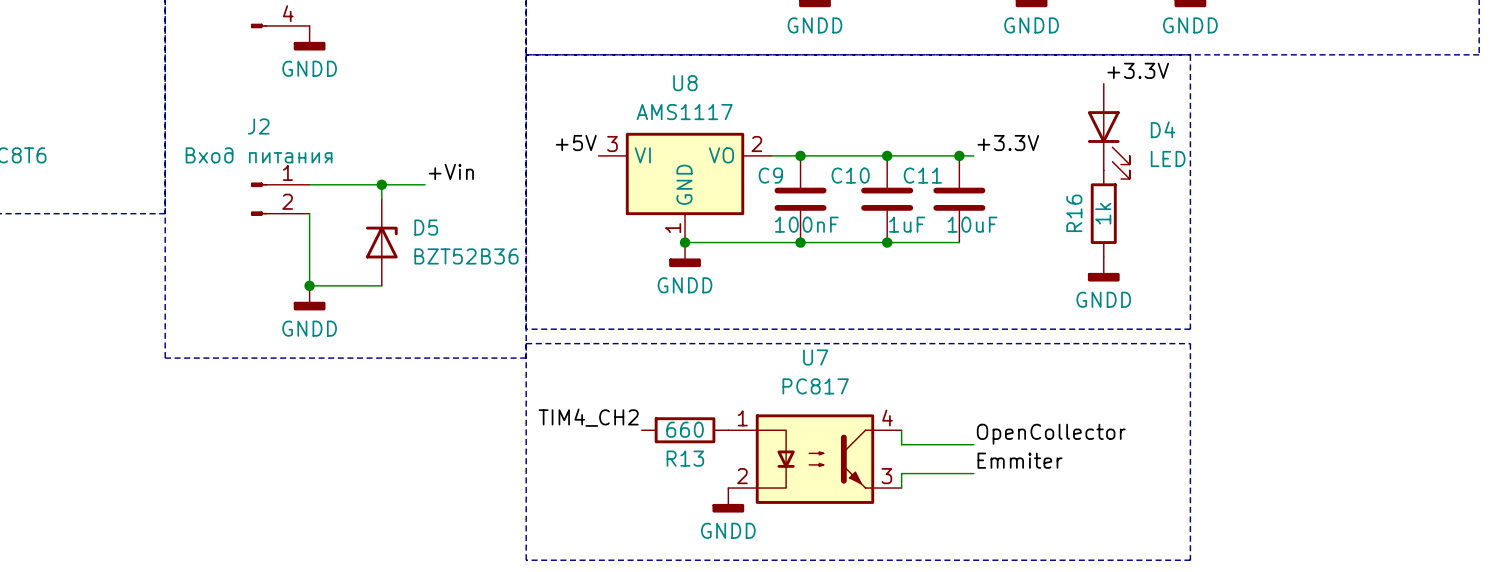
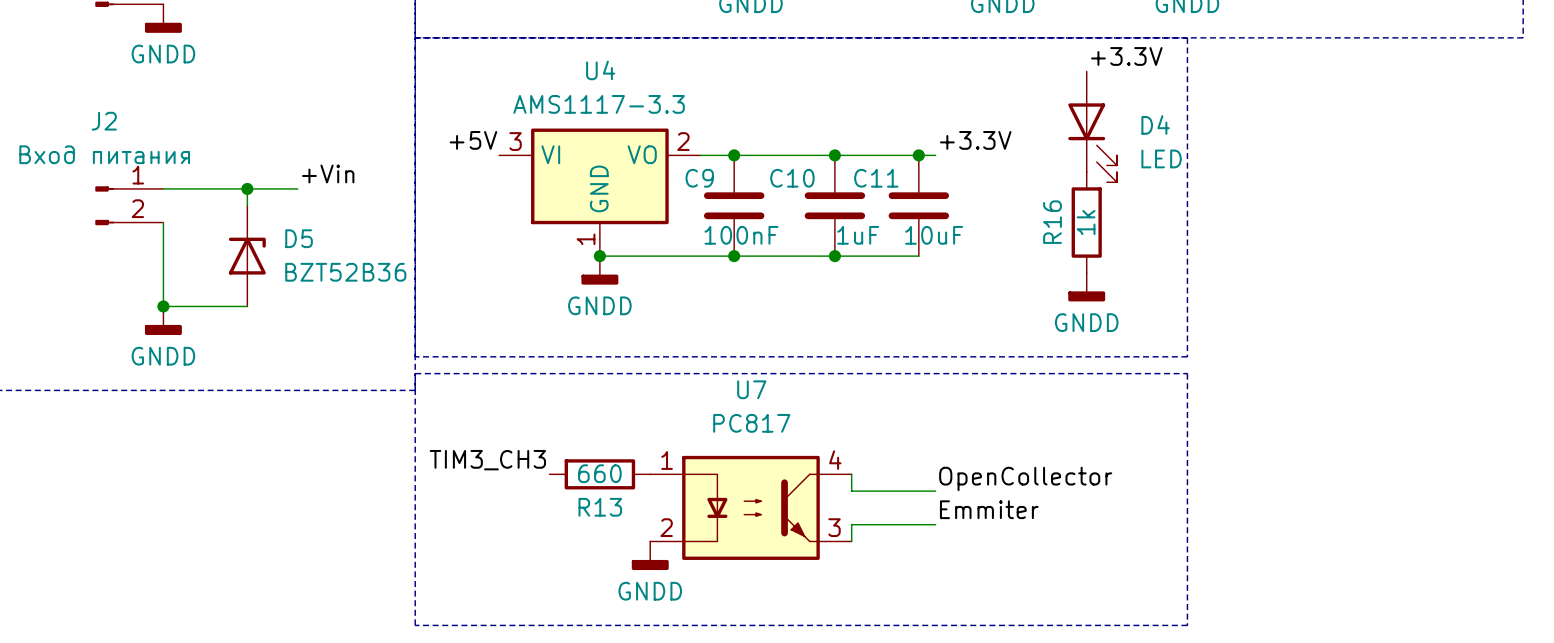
U8 name: U8 (685, 83) -> U4 (600, 70)
U8 value: AMS1117 (684, 112) -> AMS1117-3.3 (599, 104)
label: TIM4_CH2 (588, 417) -> TIM3_CH3 (487, 460)

